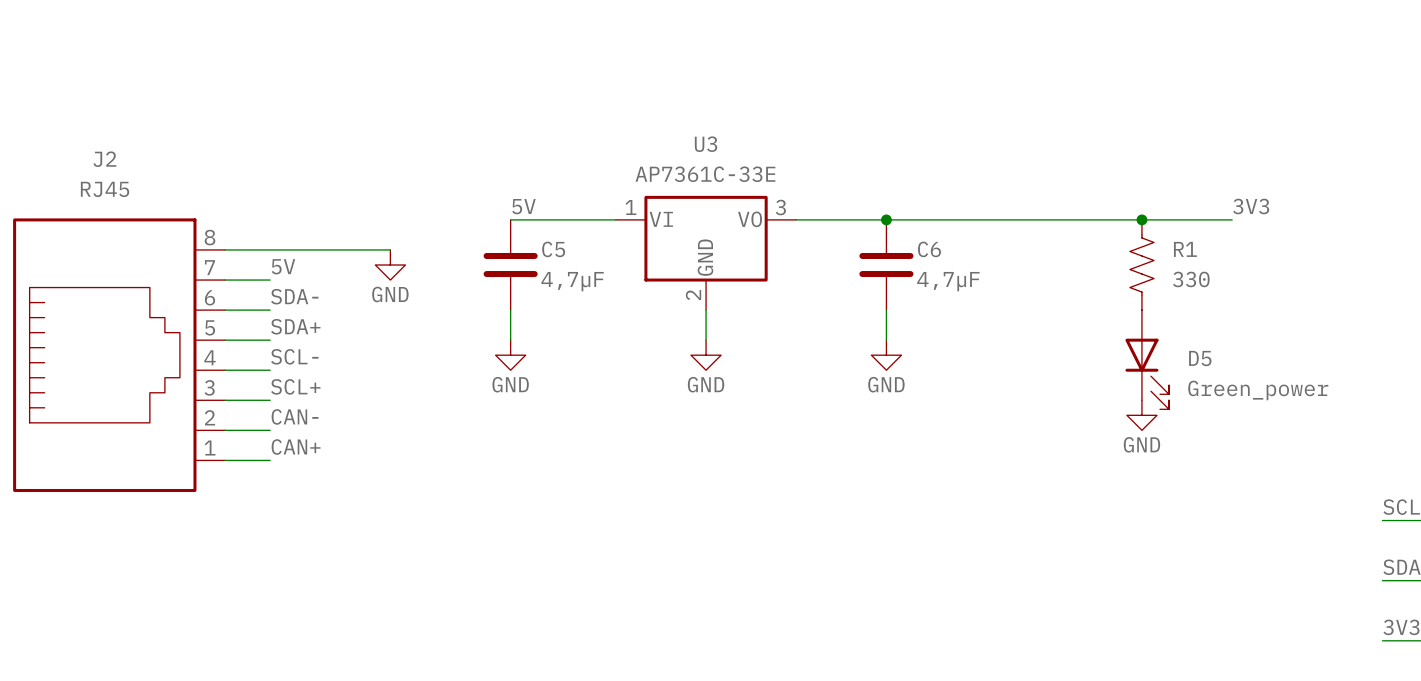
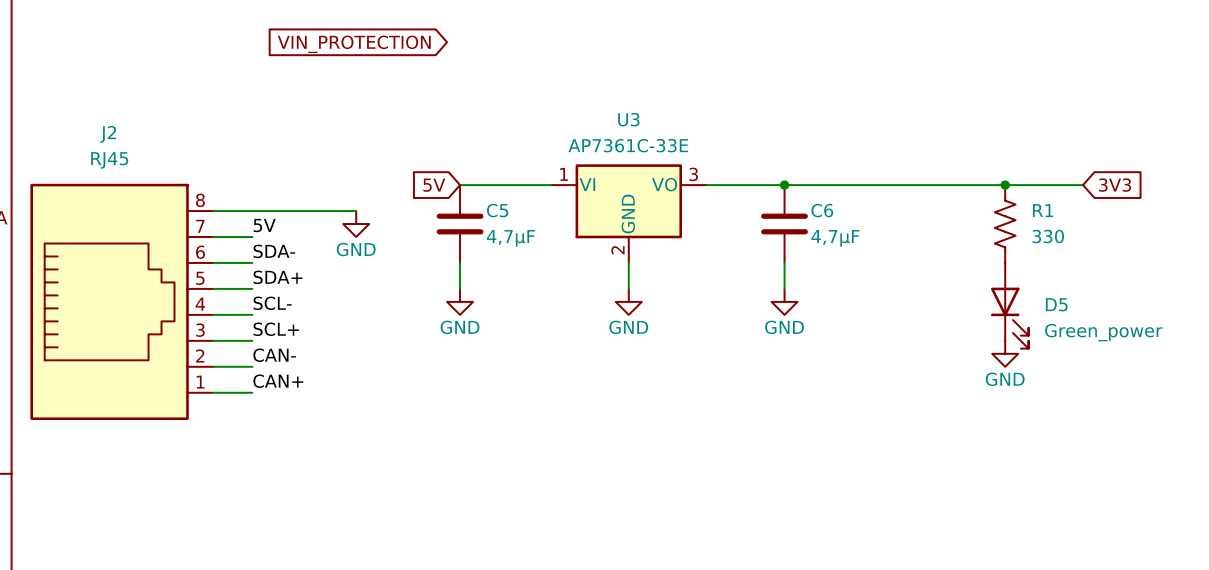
global label: none -> VIN_PROTECTION (354, 44)
label: 5V (523, 206) -> none
label: 3V3 (1251, 206) -> none
global label: none -> 3V3 (1115, 185)
global label: none -> 5V (434, 185)

